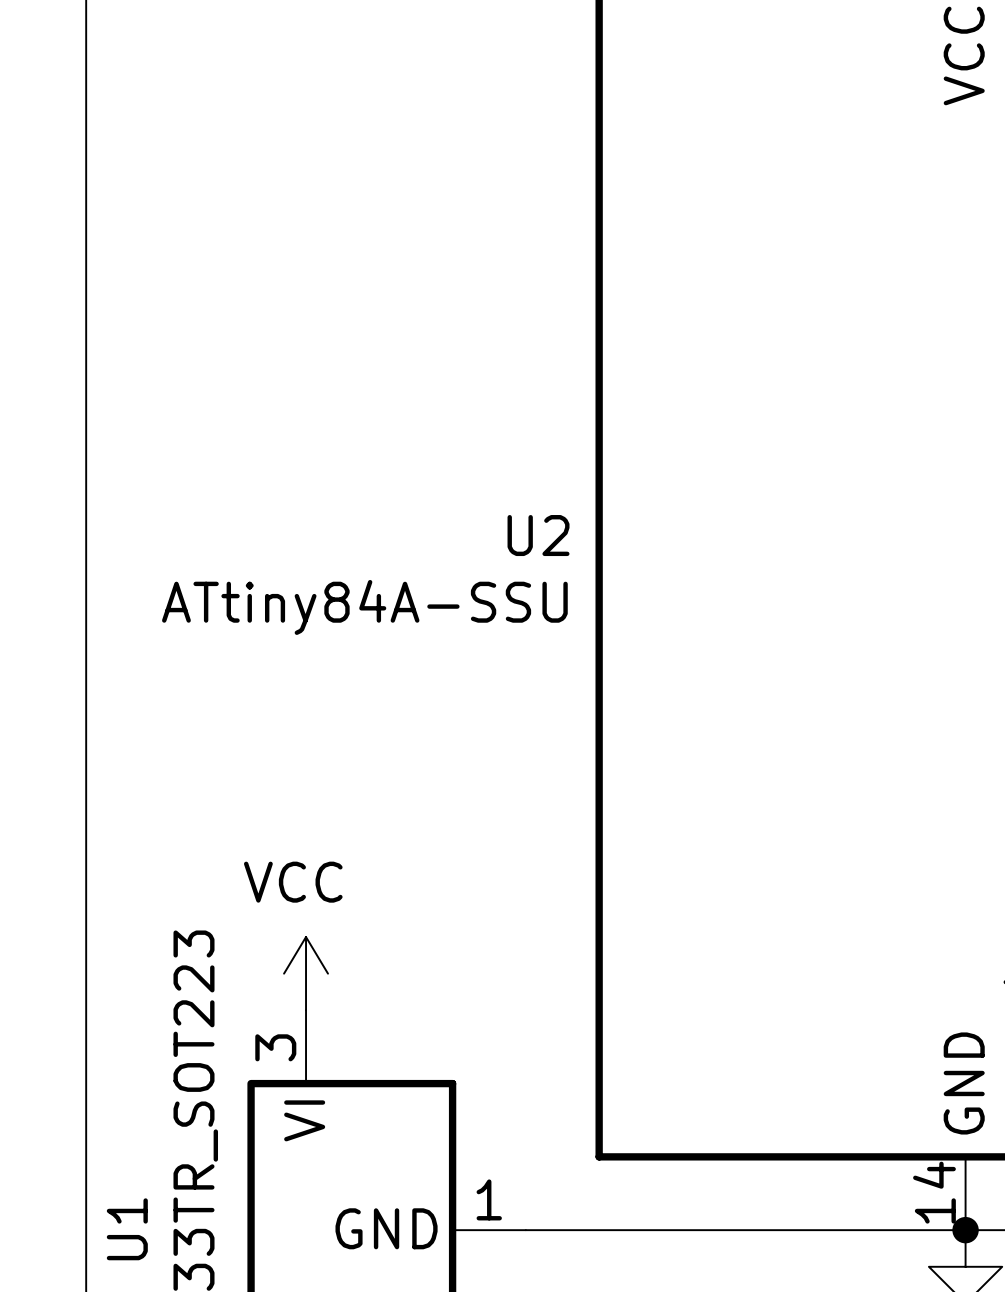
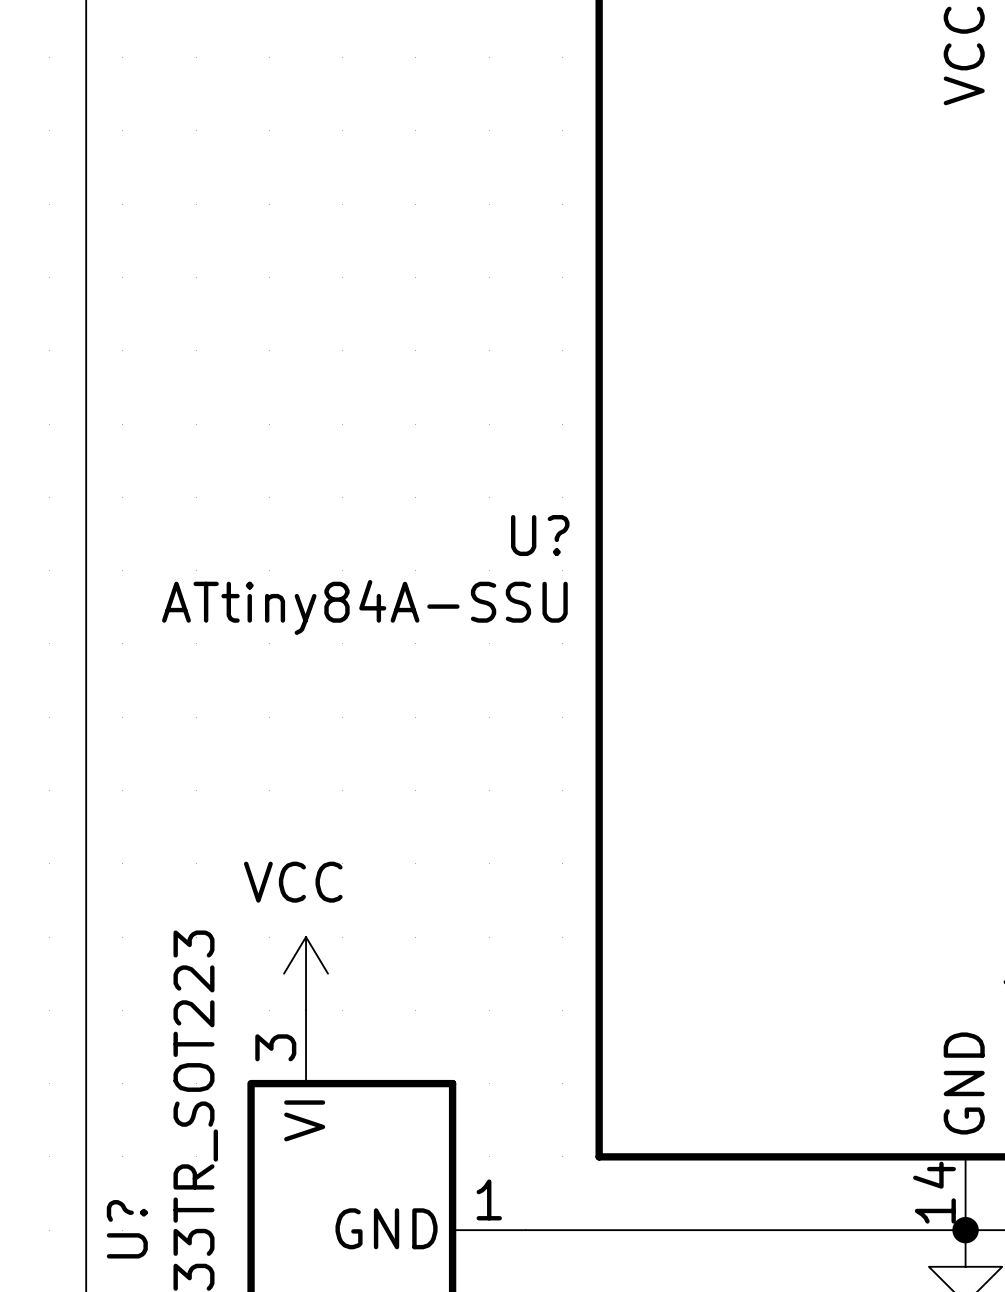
U2 name: U2 (538, 535) -> U? (540, 535)
U1 name: U1 (127, 1229) -> U? (127, 1229)

